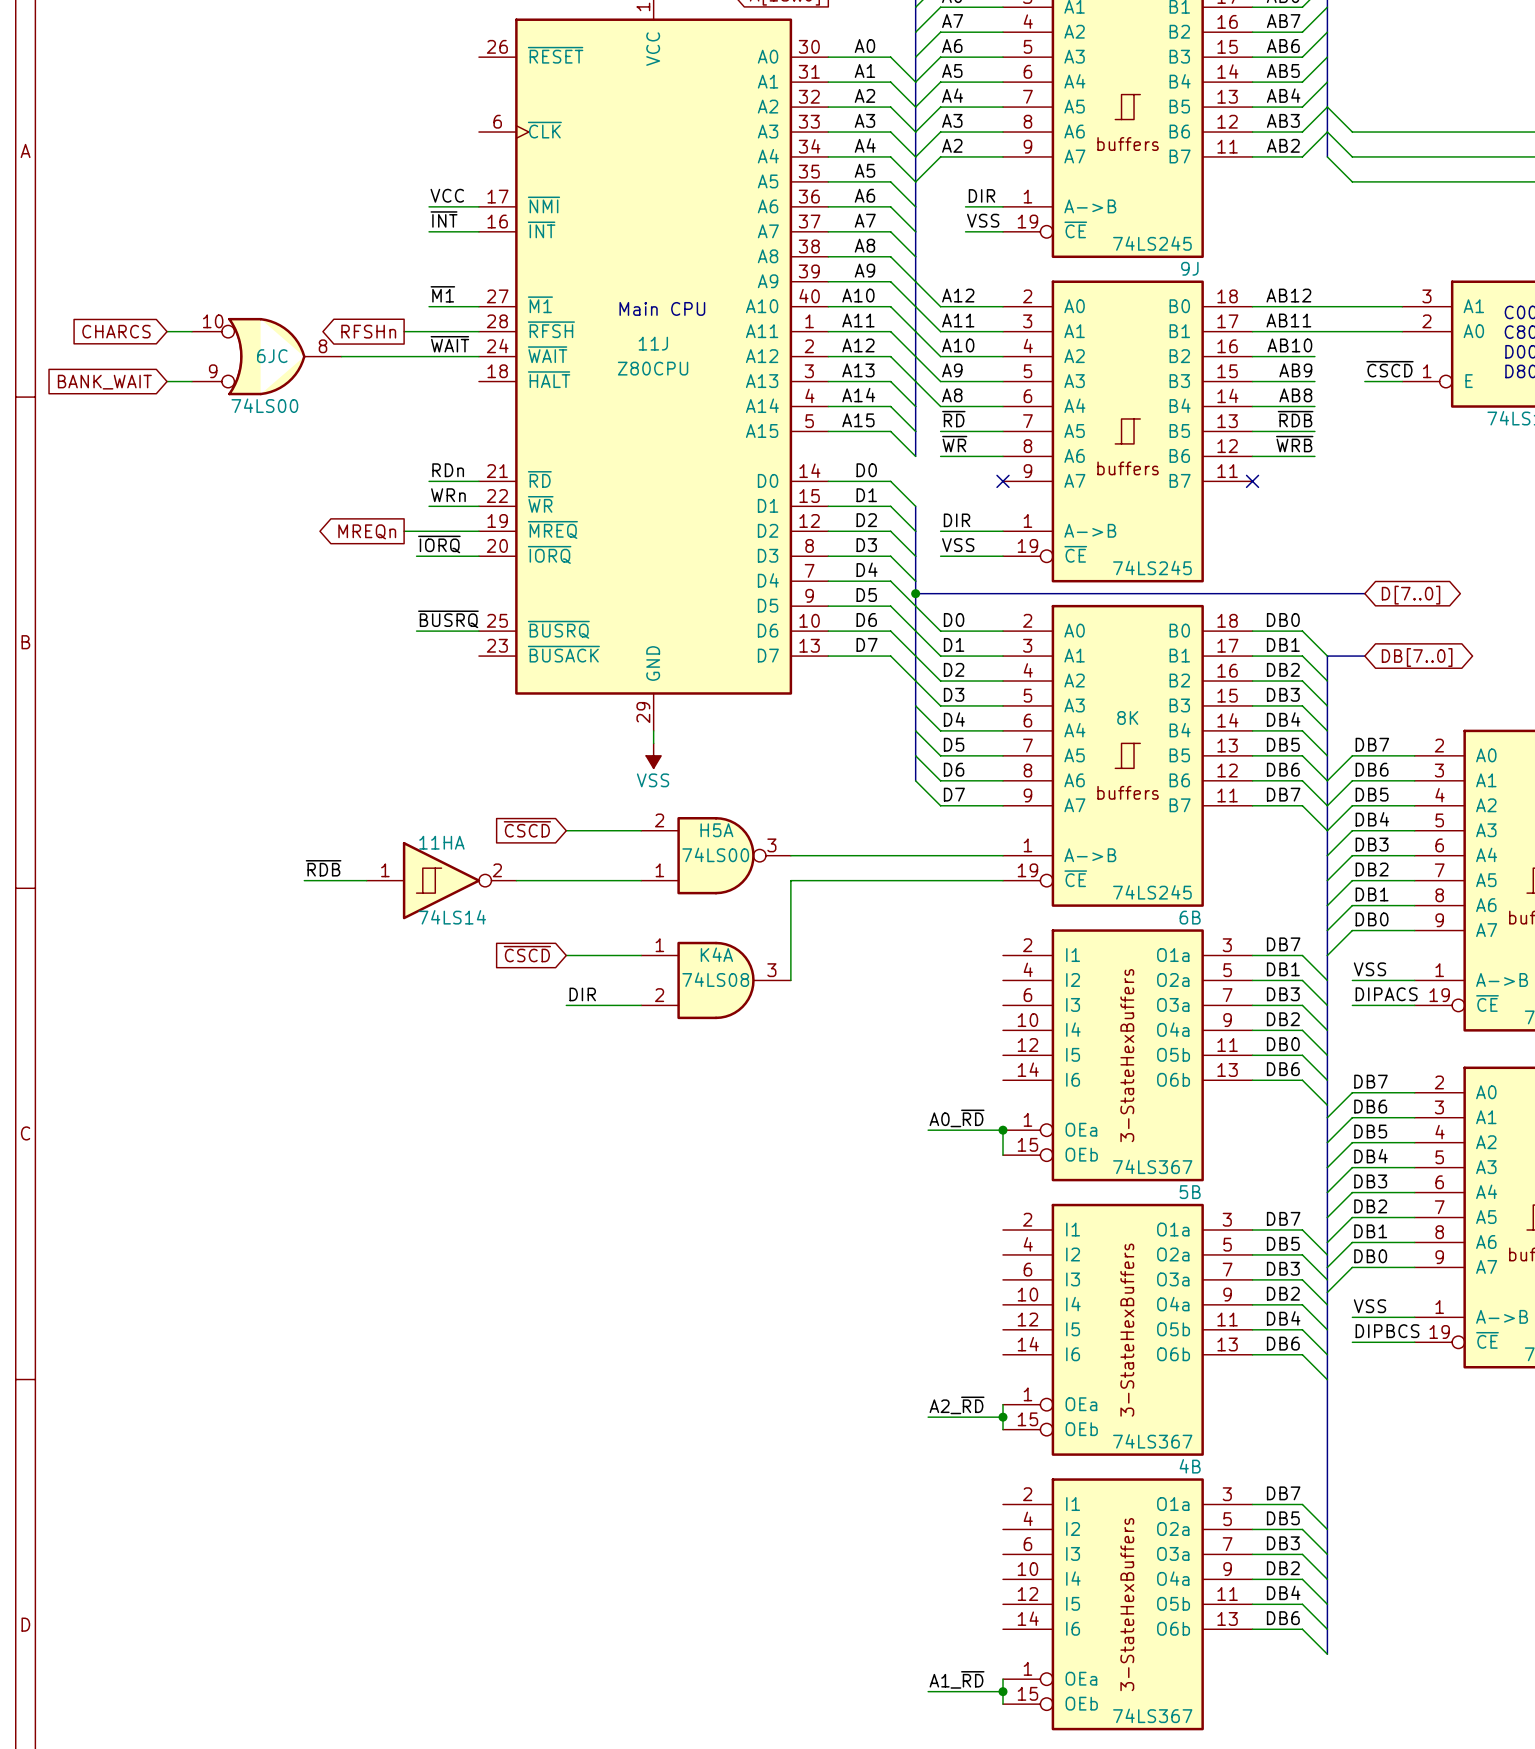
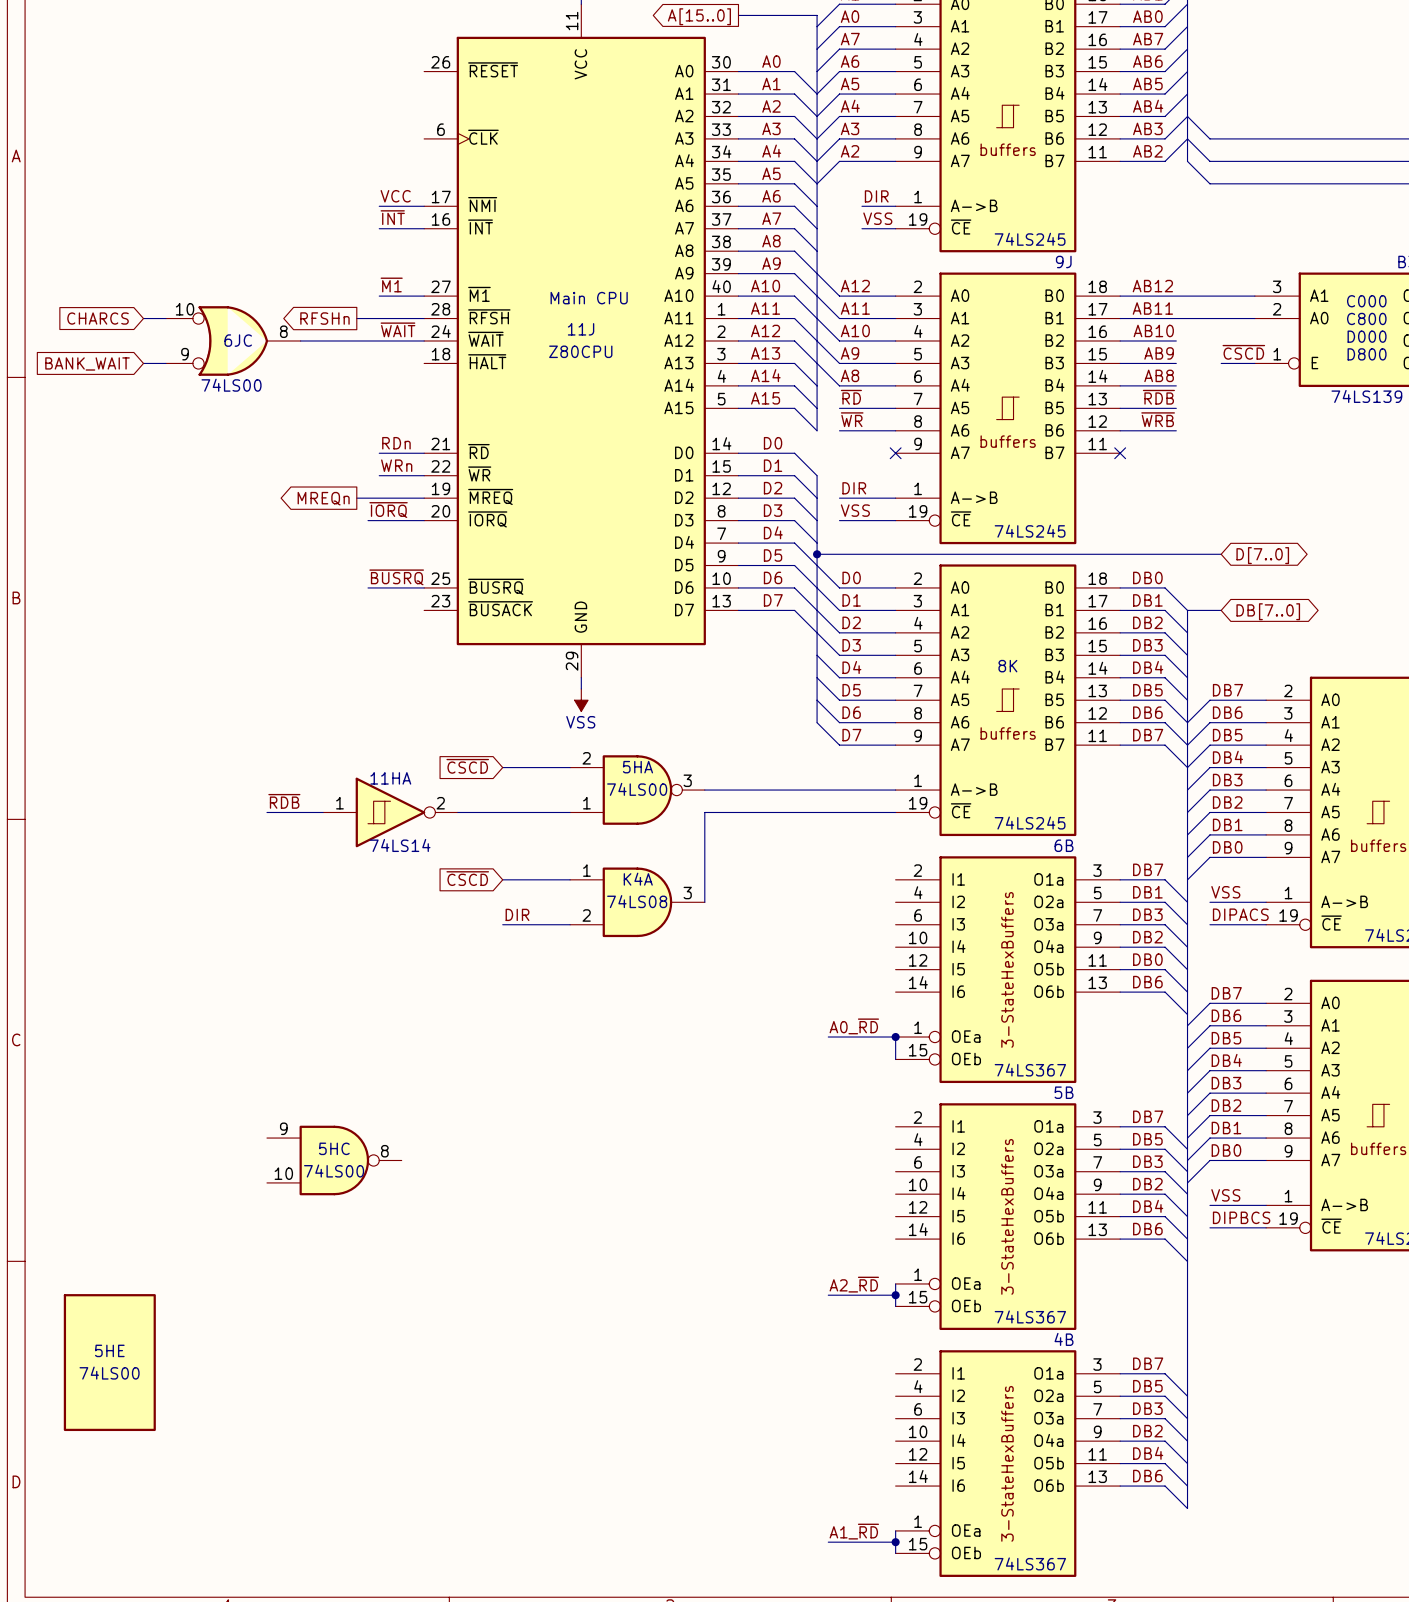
H5A name: H5A (716, 830) -> 5HA (637, 767)
5HC: none -> 74LS00 (334, 1160)
5HE: none -> 74LS00 (109, 1362)

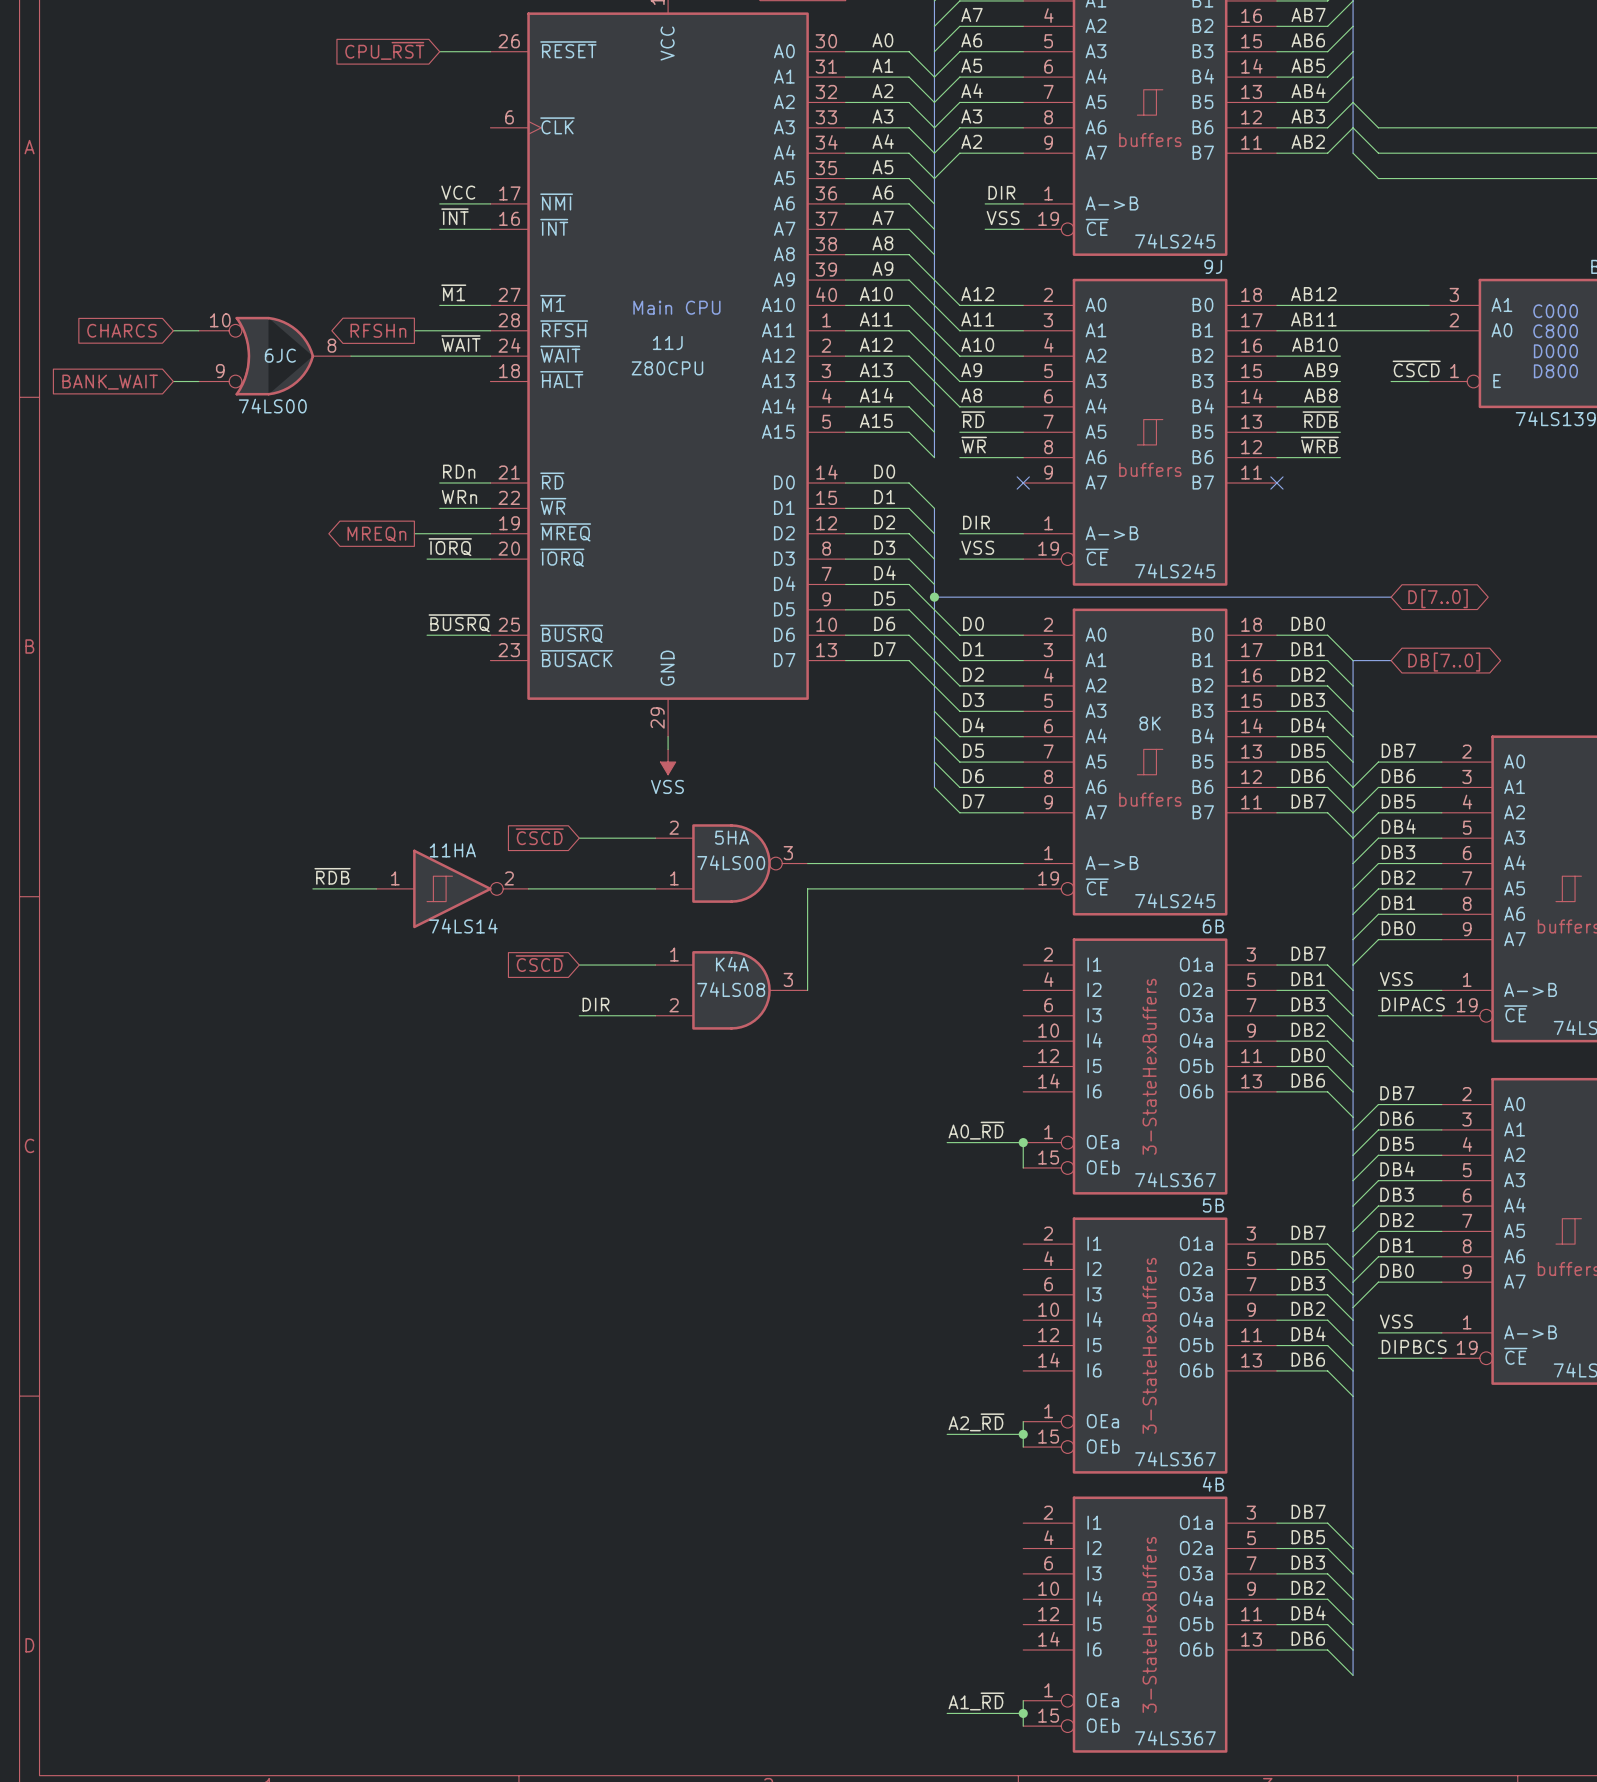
global label: none -> CPU_~{RST} (384, 50)
wire: none -> (439, 51) (490, 51)
5HC: 74LS00 (334, 1160) -> none
5HE: 74LS00 (109, 1362) -> none

